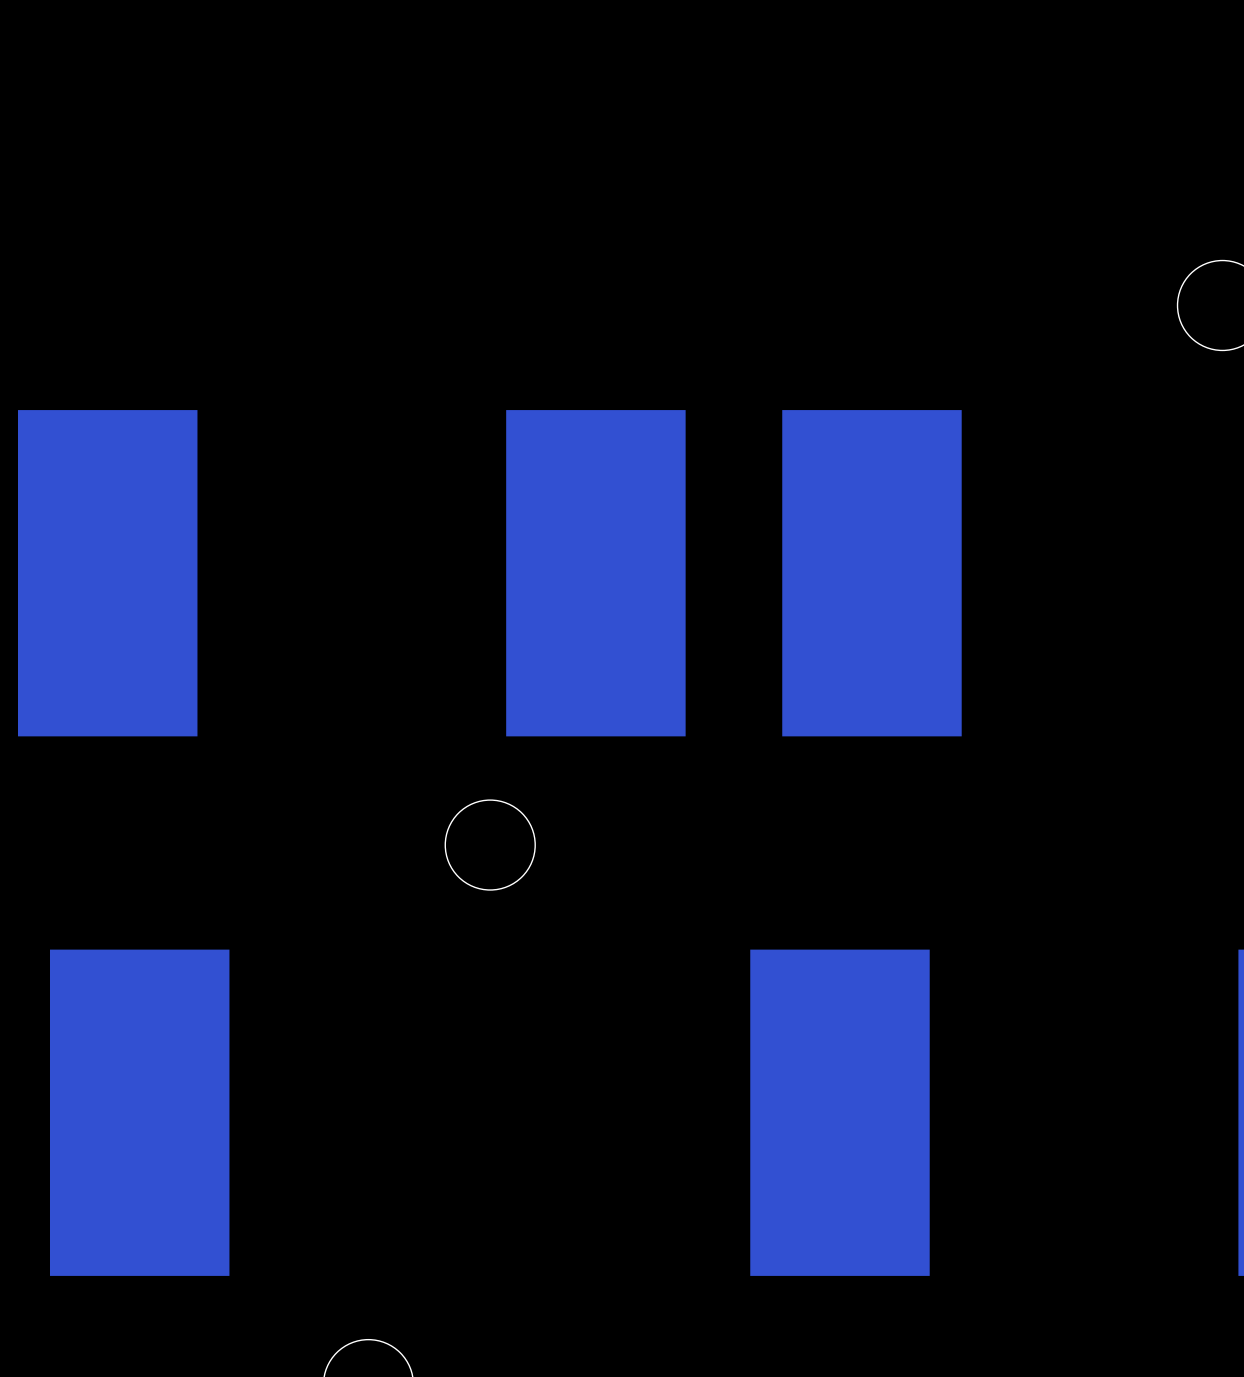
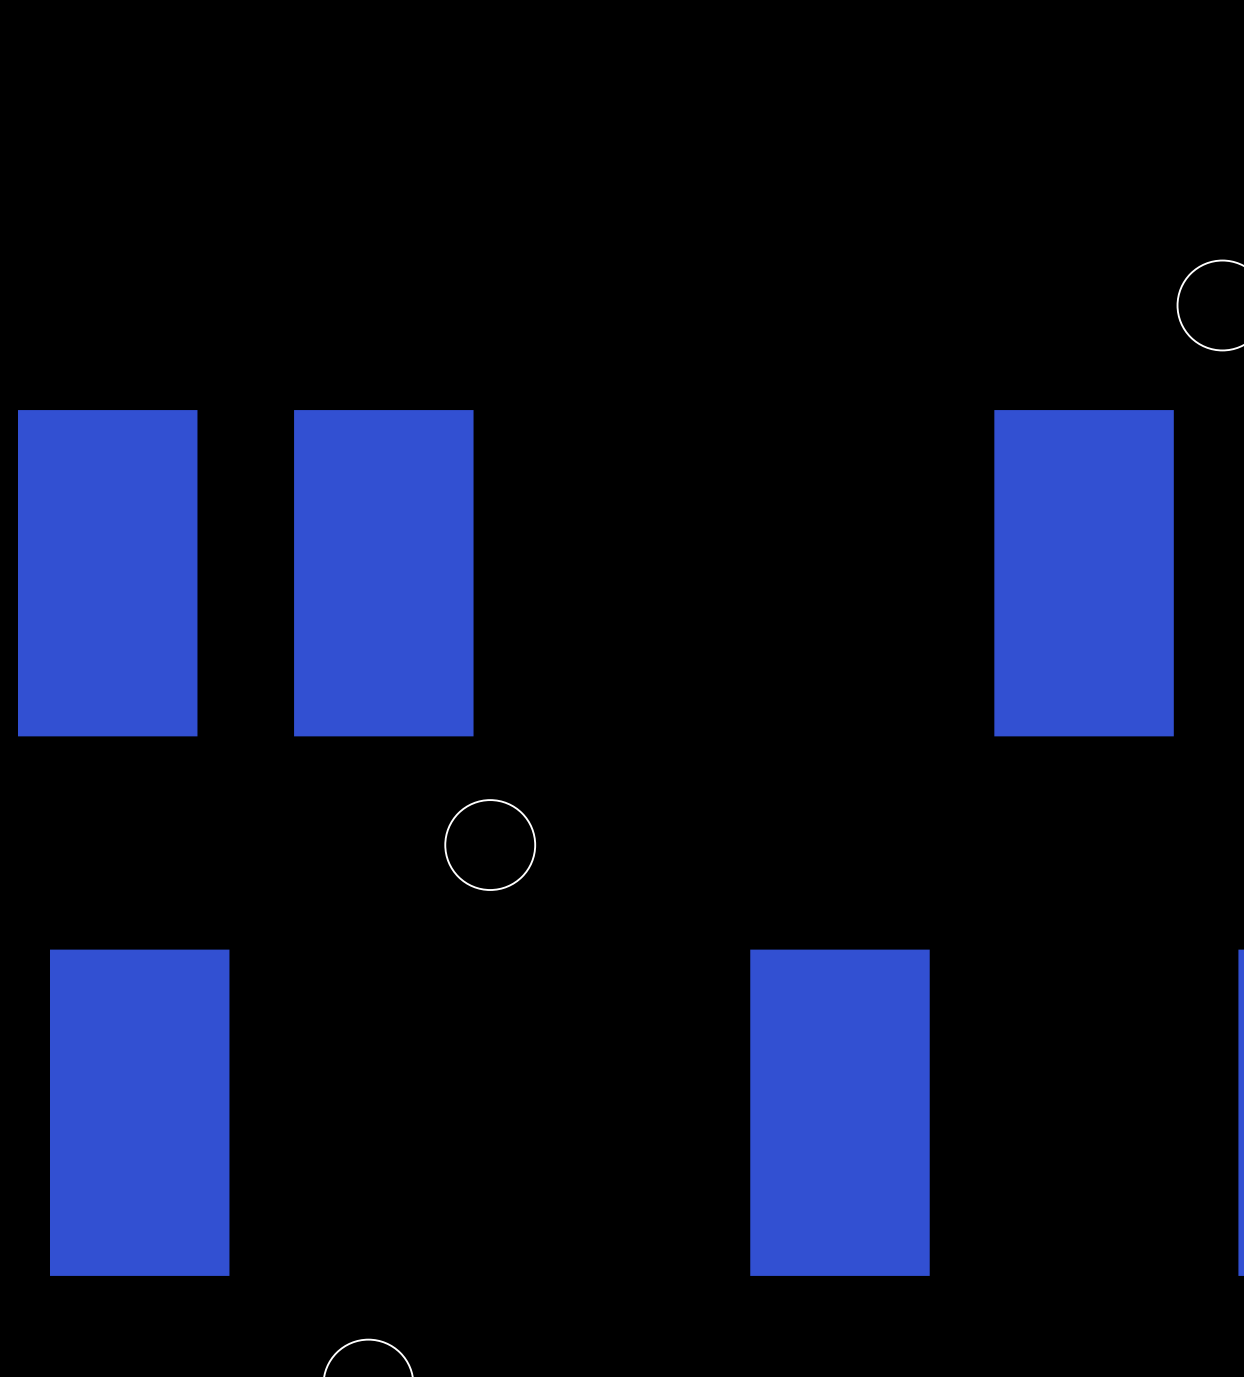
part position: (595, 573) -> (383, 573)
part position: (871, 573) -> (1084, 573)

